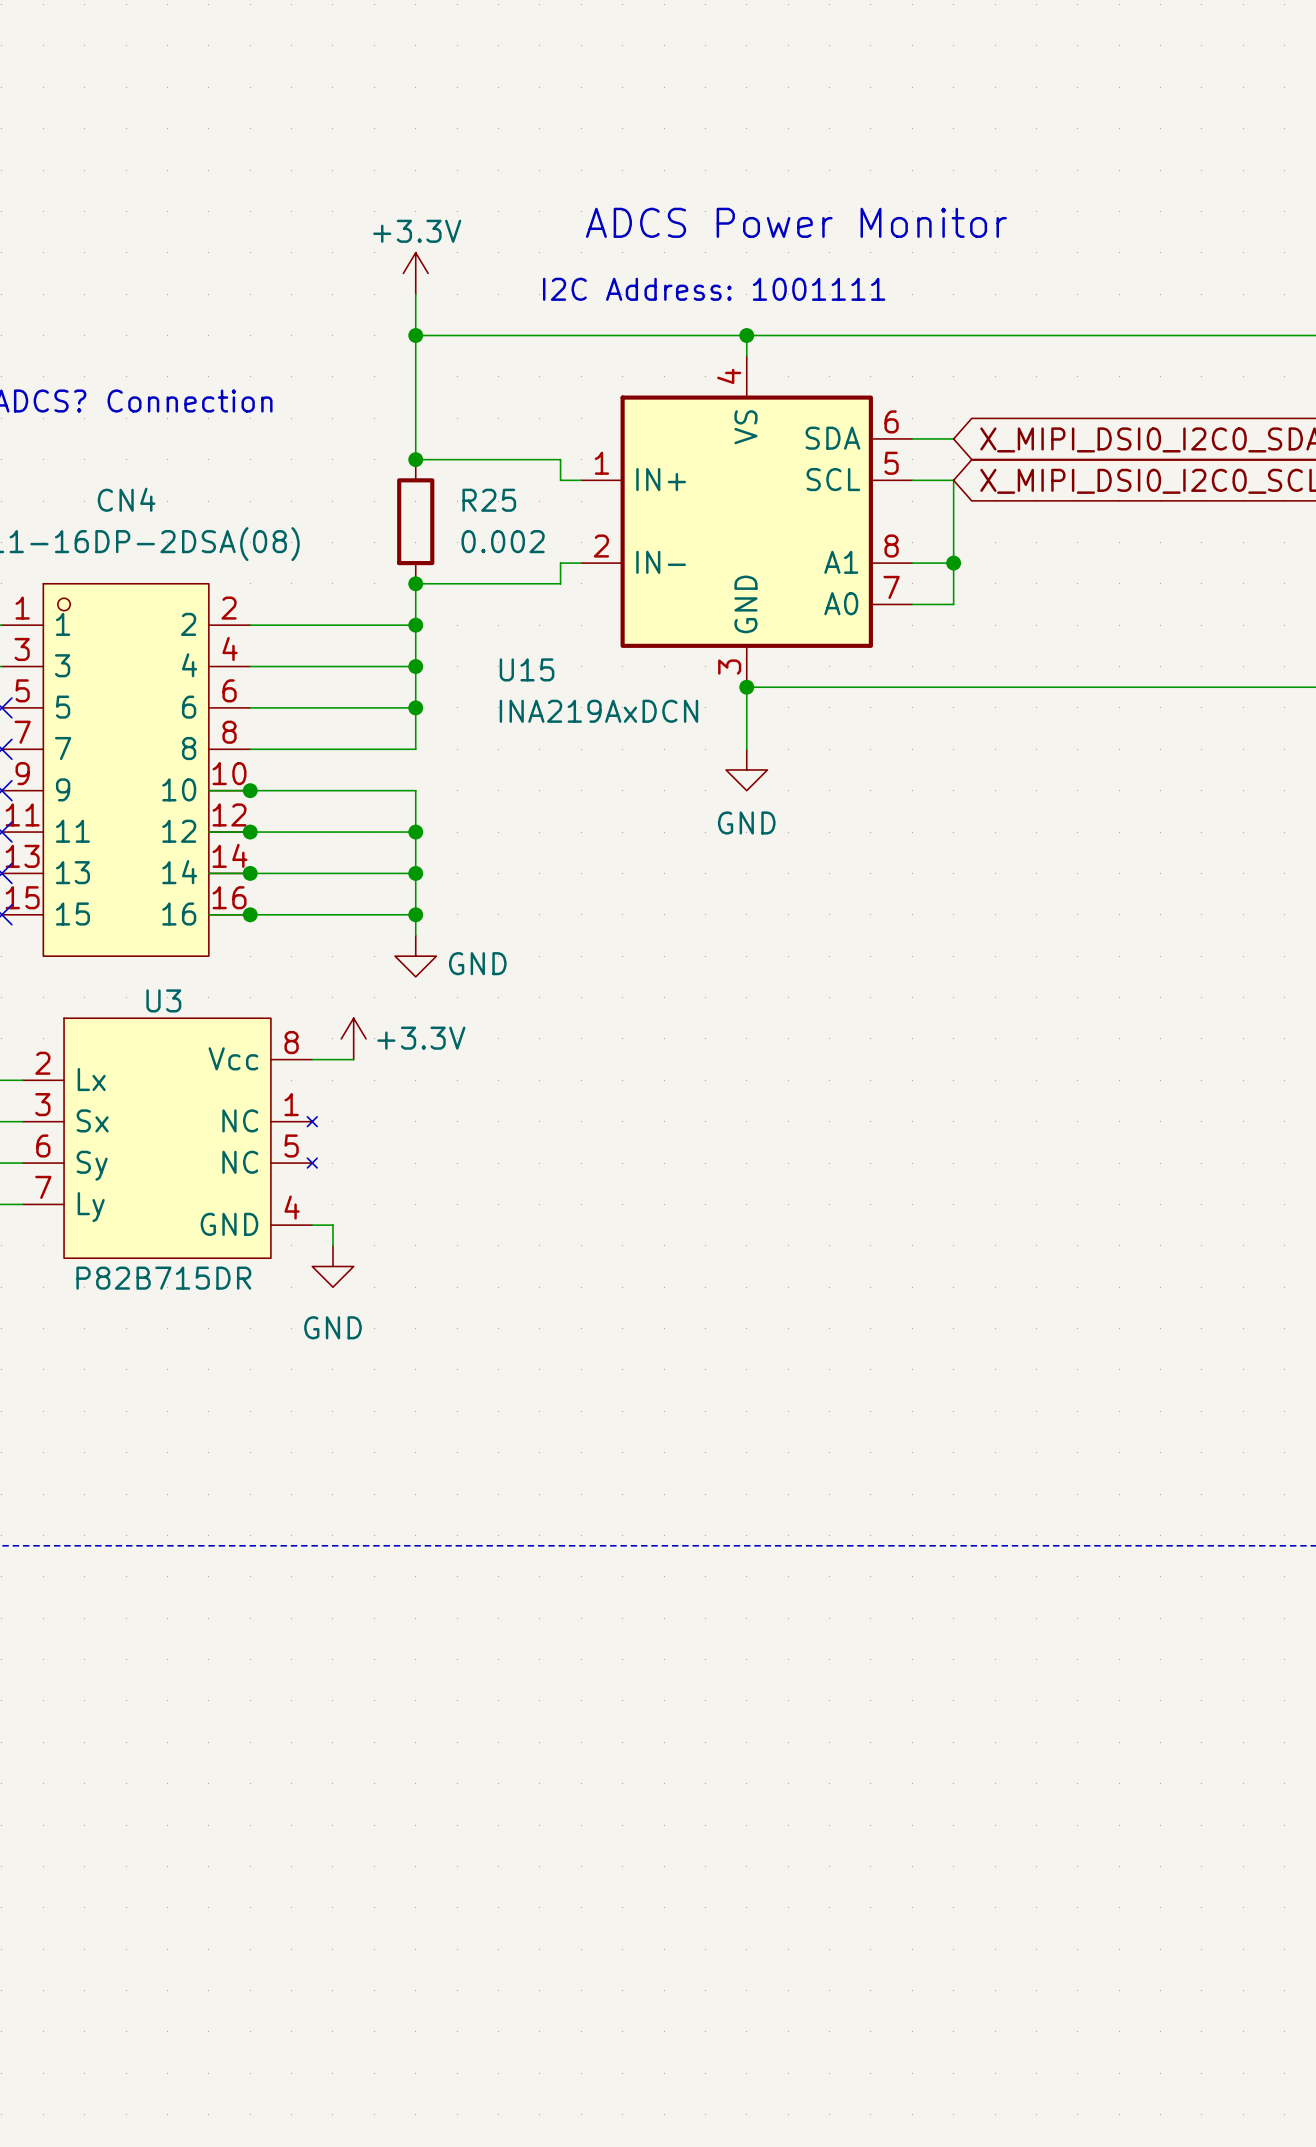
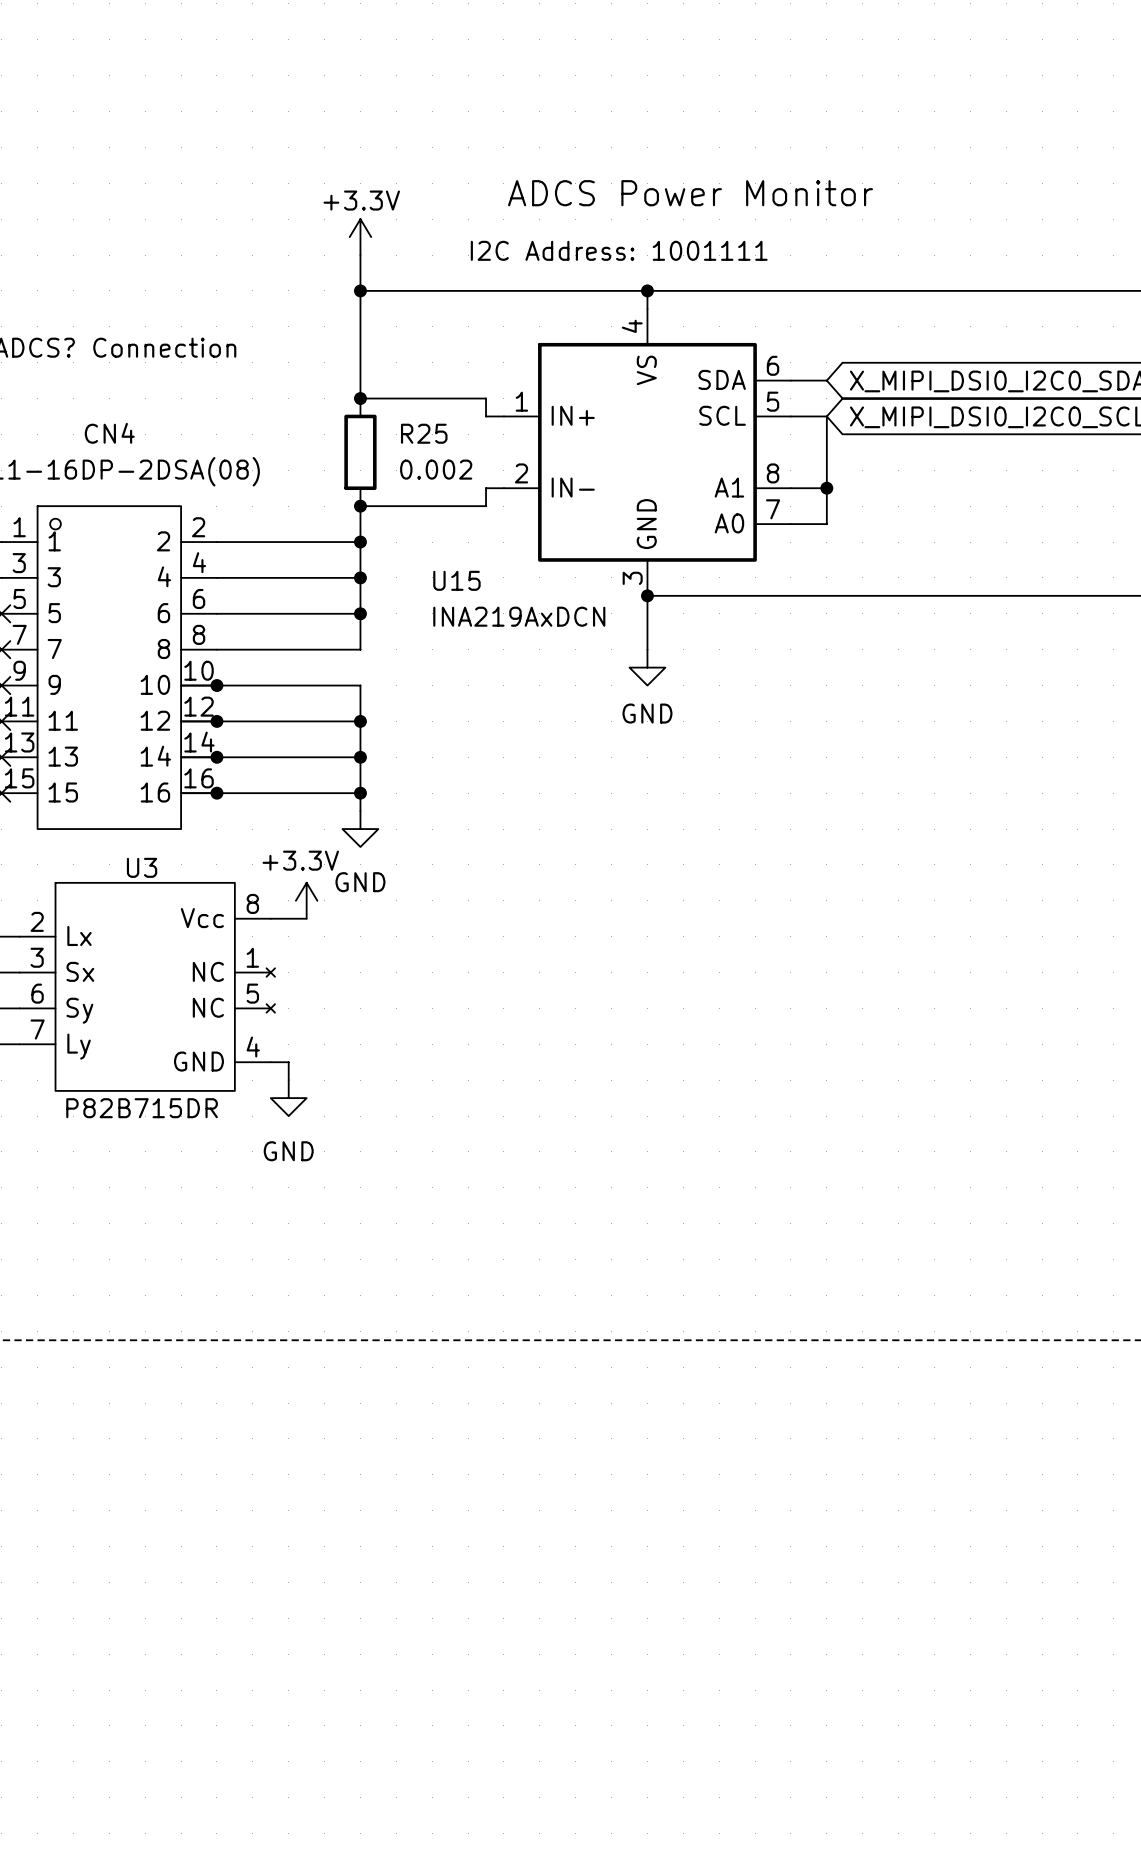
power symbol text position: GND (477, 963) -> GND (360, 882)
power symbol text position: +3.3V (421, 1038) -> +3.3V (300, 860)

